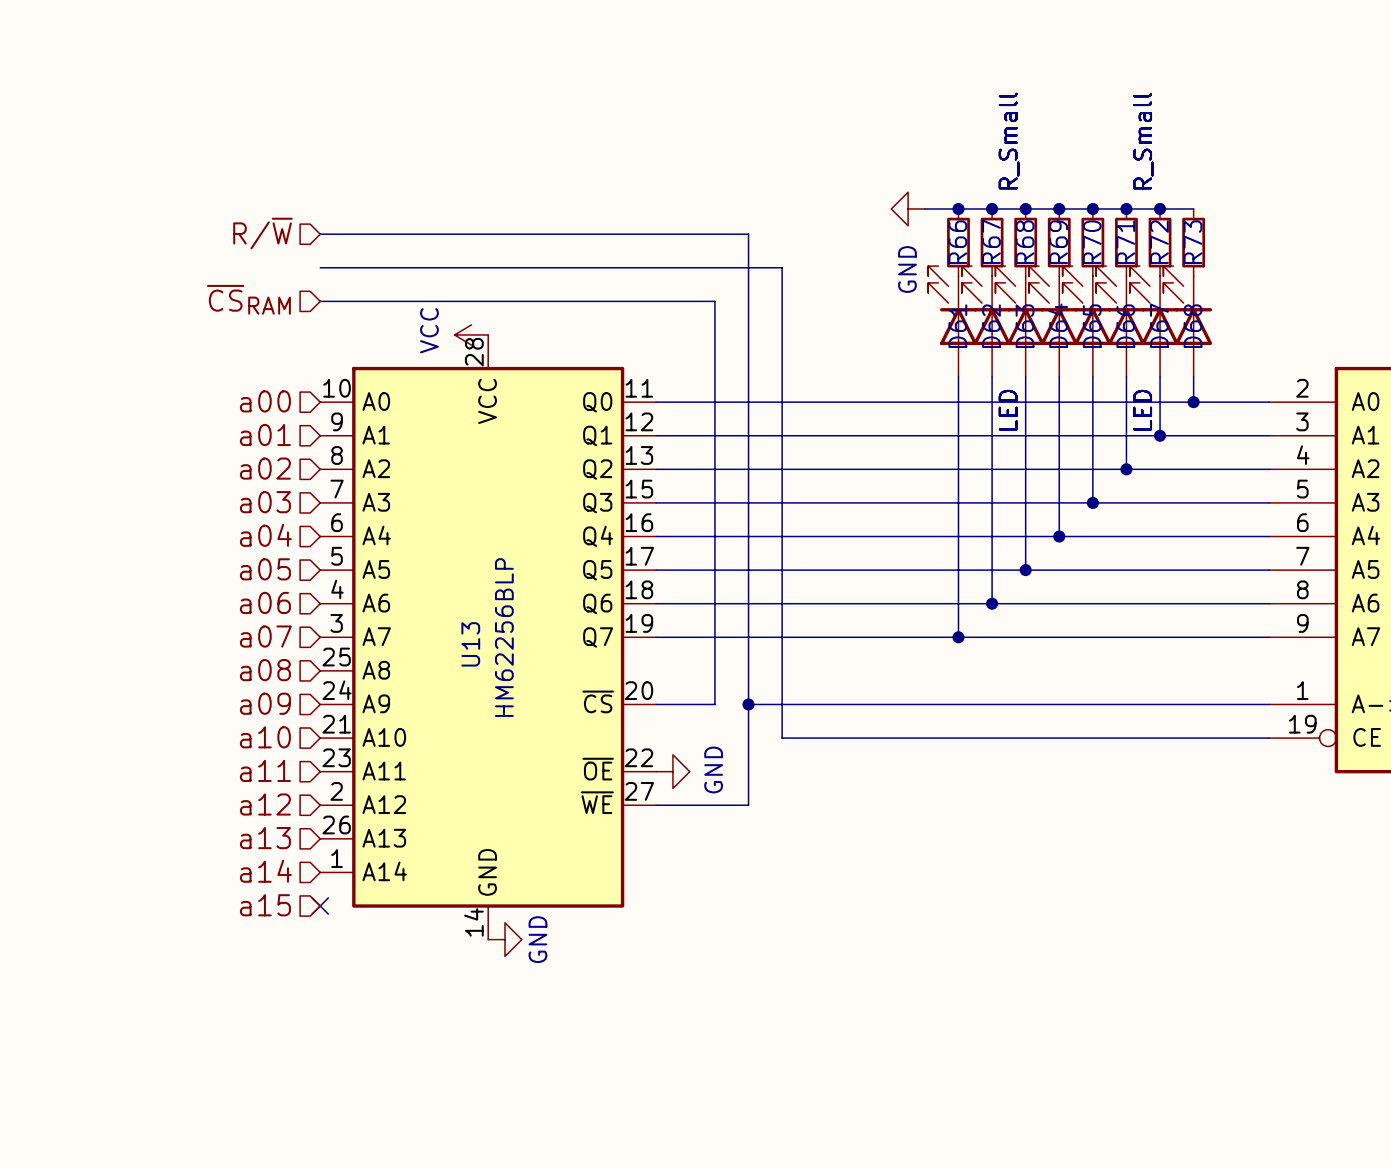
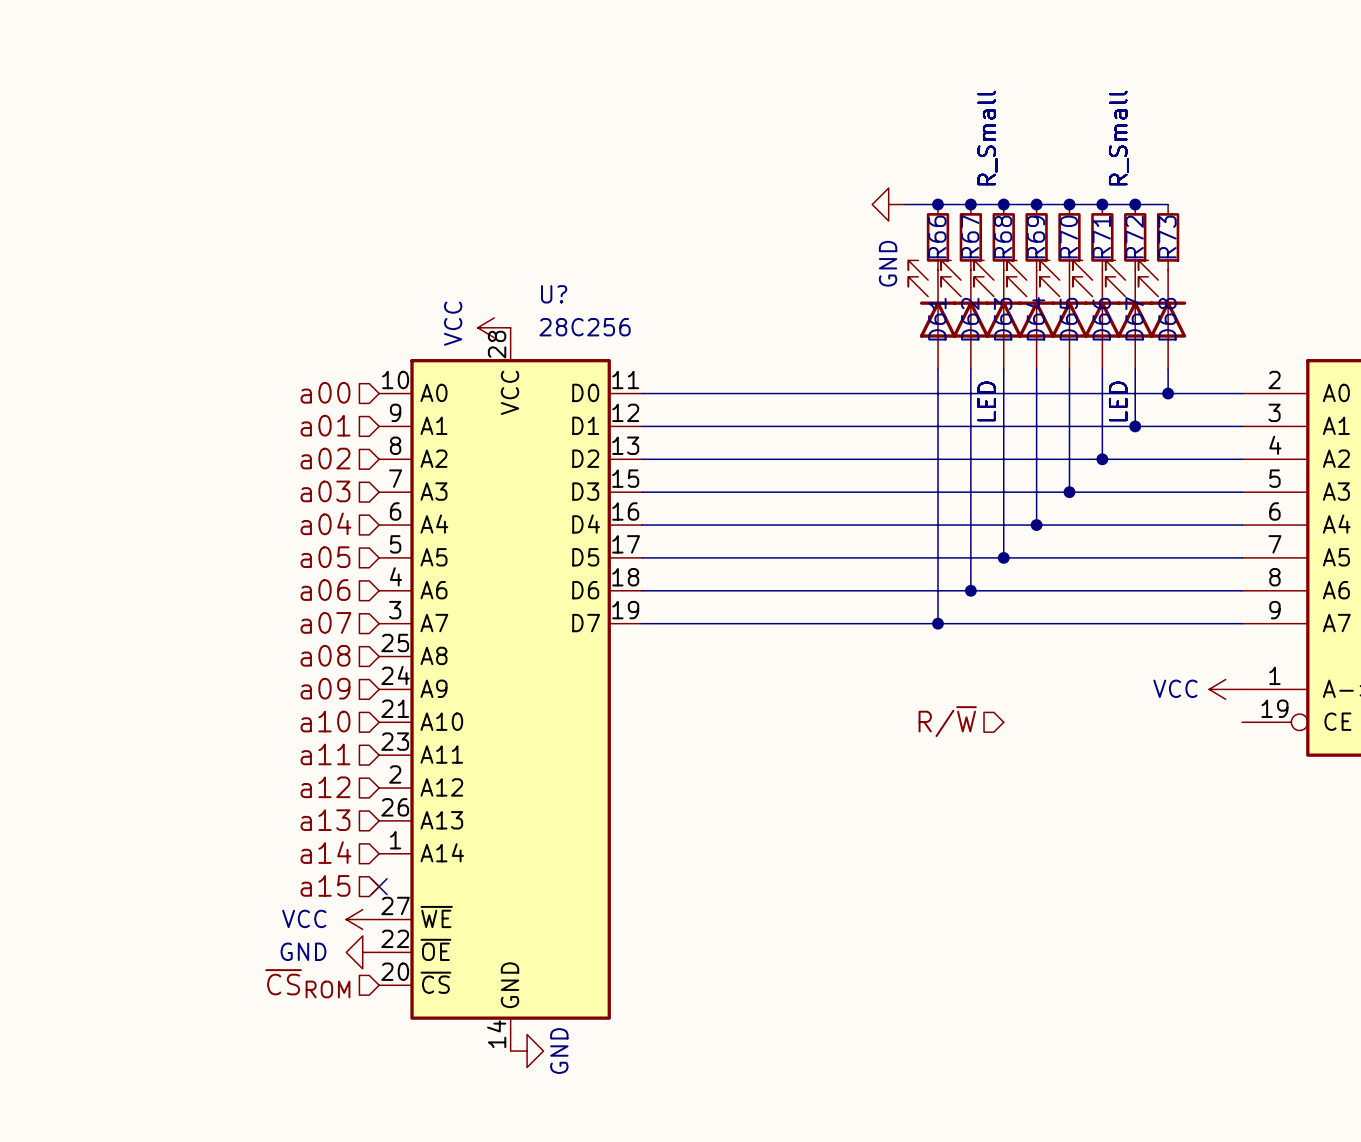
hierarchical label: R/~{W} (262, 233) -> none
wire: (320, 234) (748, 234) (748, 805) (656, 805) -> none
wire: (320, 267) (782, 267) (782, 738) (1269, 738) -> none
hierarchical label: ~{CS}RAM (248, 299) -> none
wire: (320, 301) (714, 301) (714, 704) (656, 704) -> none
power symbol position: VCC (471, 334) -> VCC (494, 327)
hierarchical label position: a00 (265, 401) -> a00 (325, 392)
hierarchical label position: a01 (265, 434) -> a01 (325, 425)
hierarchical label position: a02 (265, 468) -> a02 (325, 458)
hierarchical label position: a03 (265, 502) -> a03 (325, 491)
hierarchical label position: a04 (265, 535) -> a04 (325, 523)
hierarchical label position: a05 (265, 569) -> a05 (325, 557)
hierarchical label position: a06 (265, 602) -> a06 (325, 590)
hierarchical label position: a07 (265, 636) -> a07 (325, 622)
U13: HM62256BLP (488, 637) -> none
hierarchical label position: a08 (265, 670) -> a08 (325, 655)
hierarchical label position: a09 (265, 703) -> a09 (325, 688)
U?: none -> 28C256 (510, 689)
wire: (748, 704) (1269, 704) -> none
junction: (748, 704) -> none
power symbol: none -> VCC (1225, 689)
hierarchical label position: a10 (265, 737) -> a10 (325, 721)
hierarchical label: none -> R/~{W} (947, 721)
hierarchical label position: a11 (265, 770) -> a11 (325, 754)
power symbol: GND (672, 771) -> none
hierarchical label position: a12 (265, 804) -> a12 (325, 787)
hierarchical label position: a13 (265, 838) -> a13 (325, 820)
hierarchical label position: a14 (265, 871) -> a14 (325, 852)
hierarchical label position: a15 (265, 905) -> a15 (325, 885)
no-connect mark position: (320, 906) -> (379, 886)
power symbol: none -> VCC (362, 919)
power symbol: GND (505, 939) -> none
power symbol: none -> GND (362, 952)
hierarchical label: none -> ~{CS}ROM (307, 983)
power symbol: none -> GND (527, 1051)

